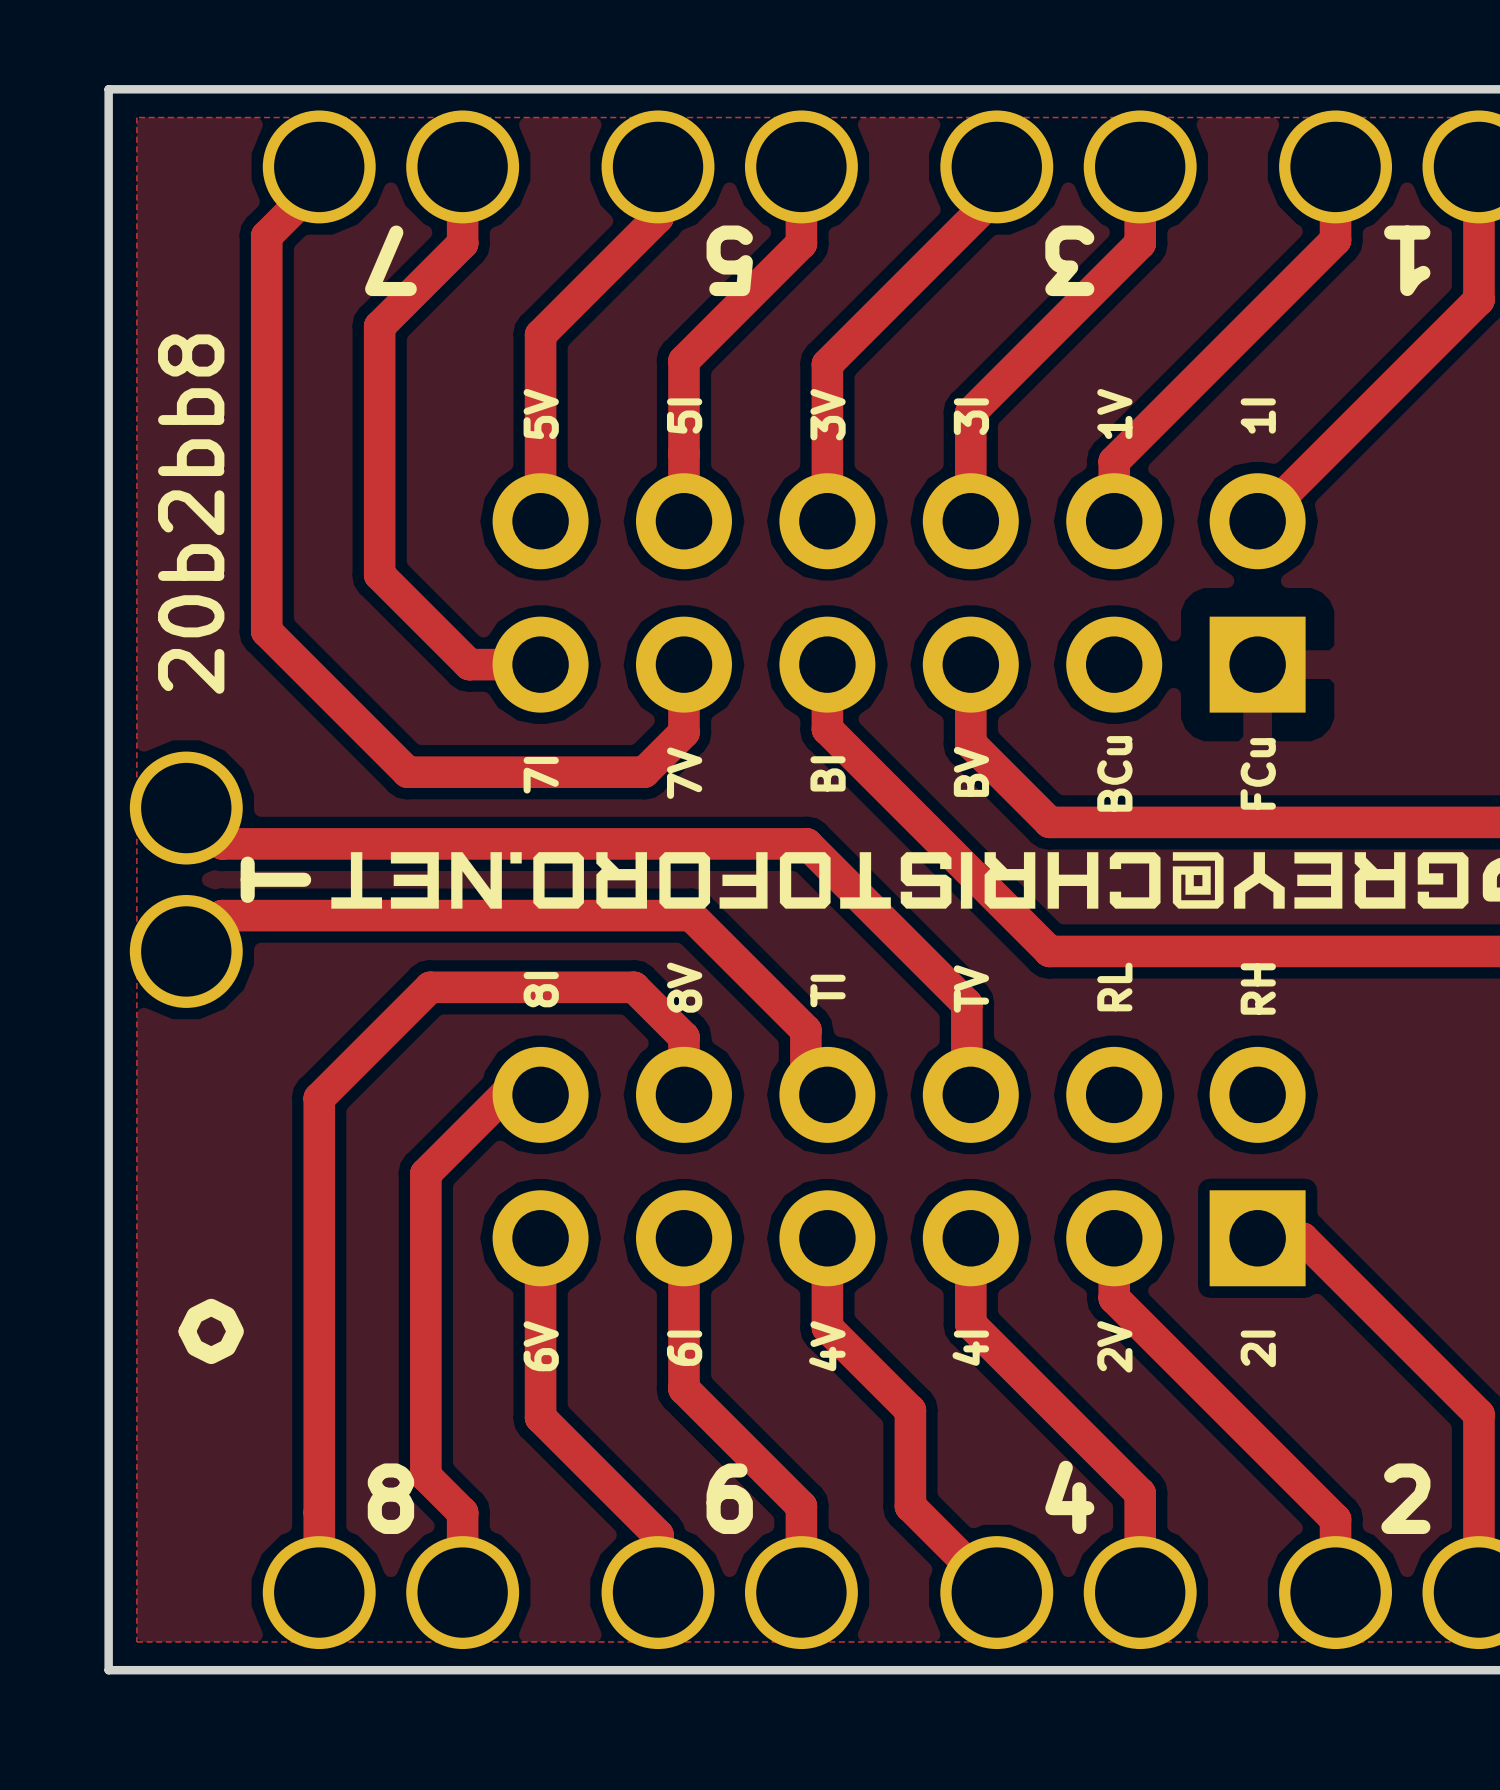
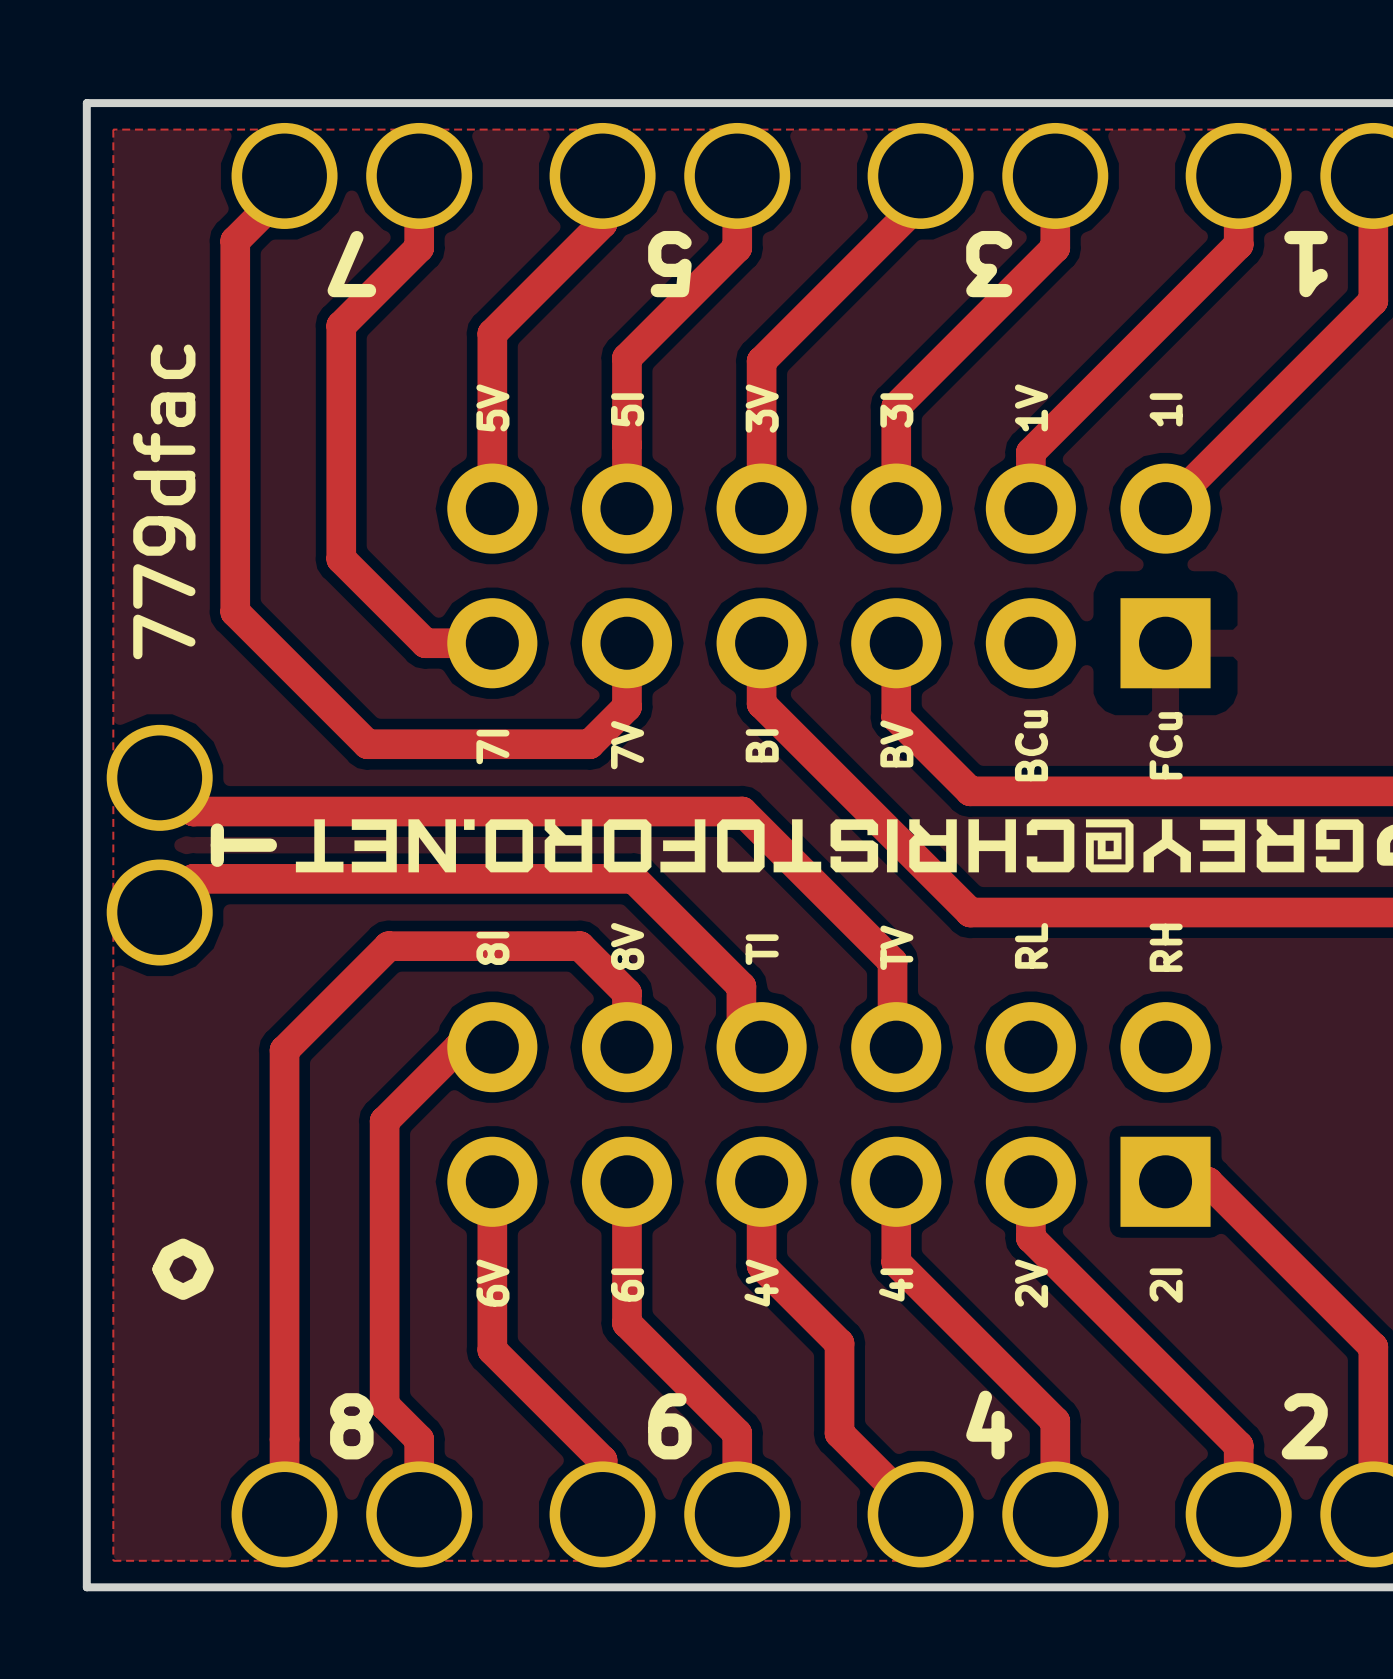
text: 20b2bb8 (191, 514) -> 779dfac (164, 501)

